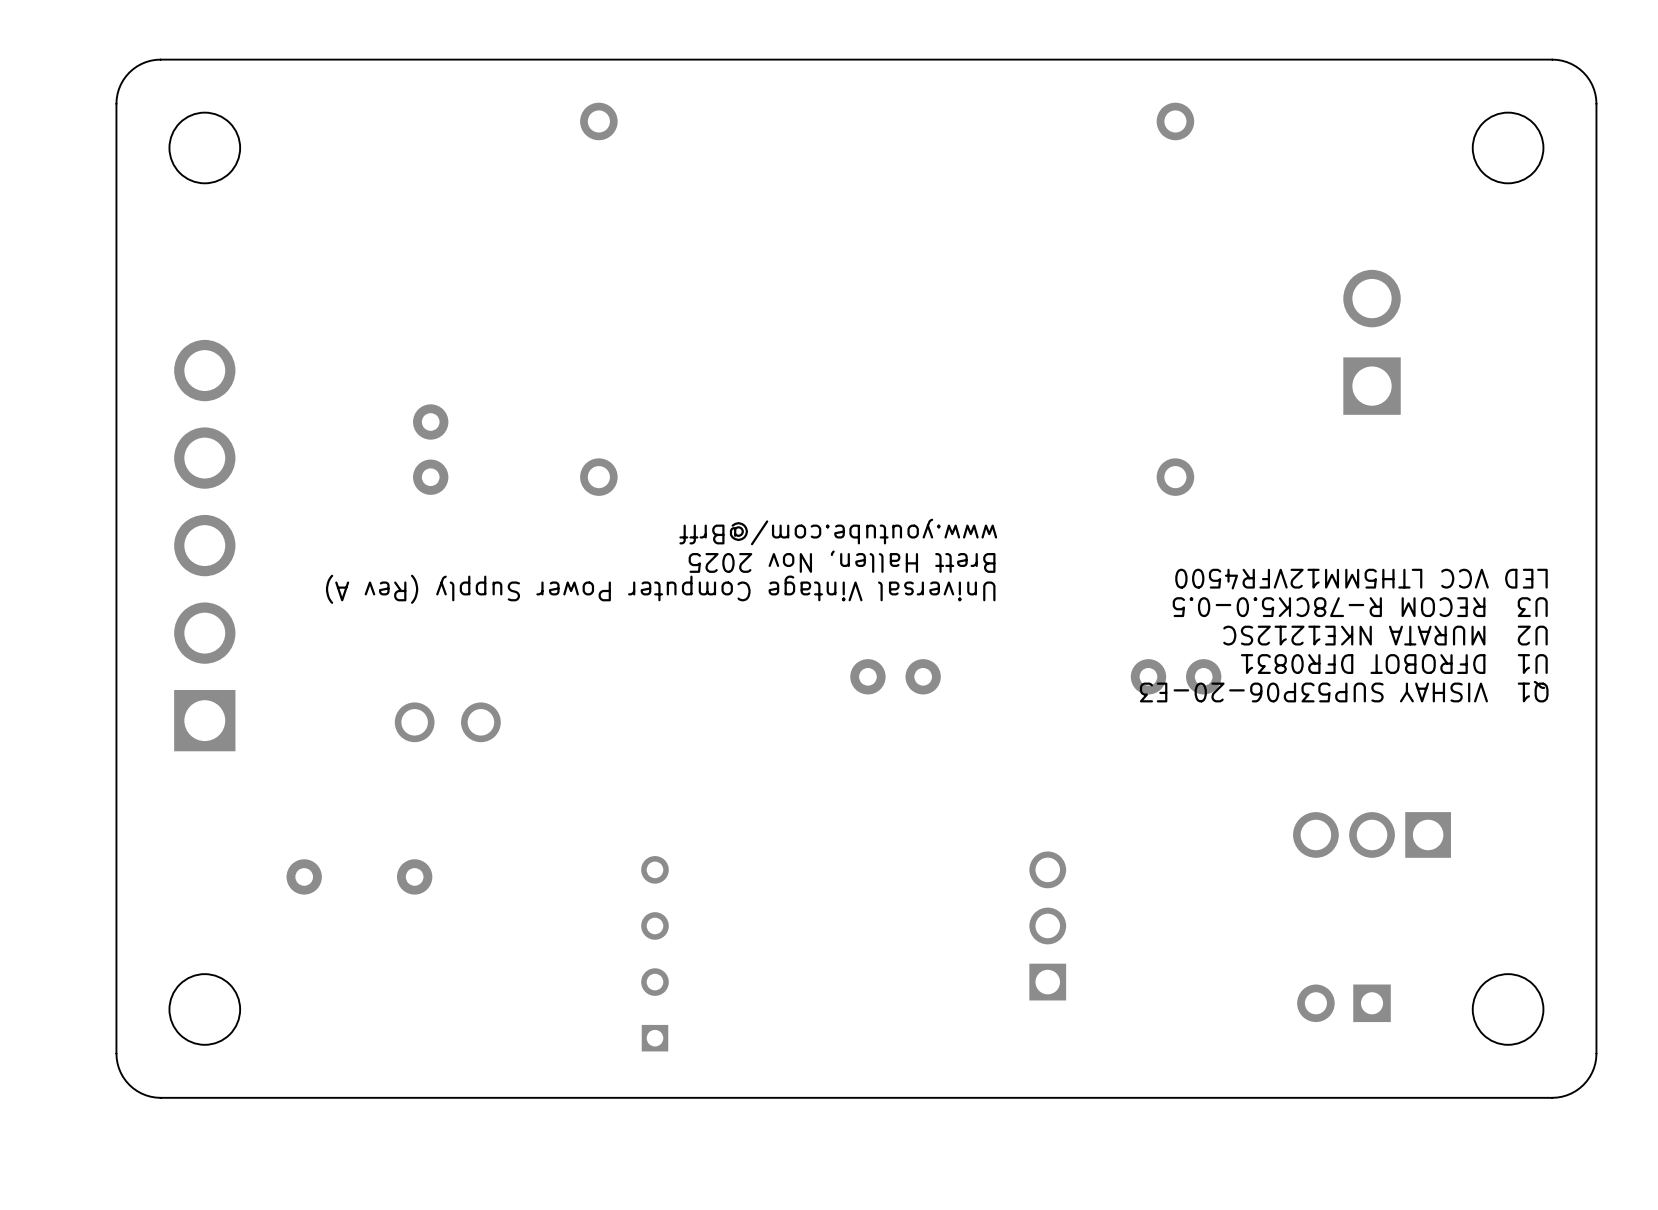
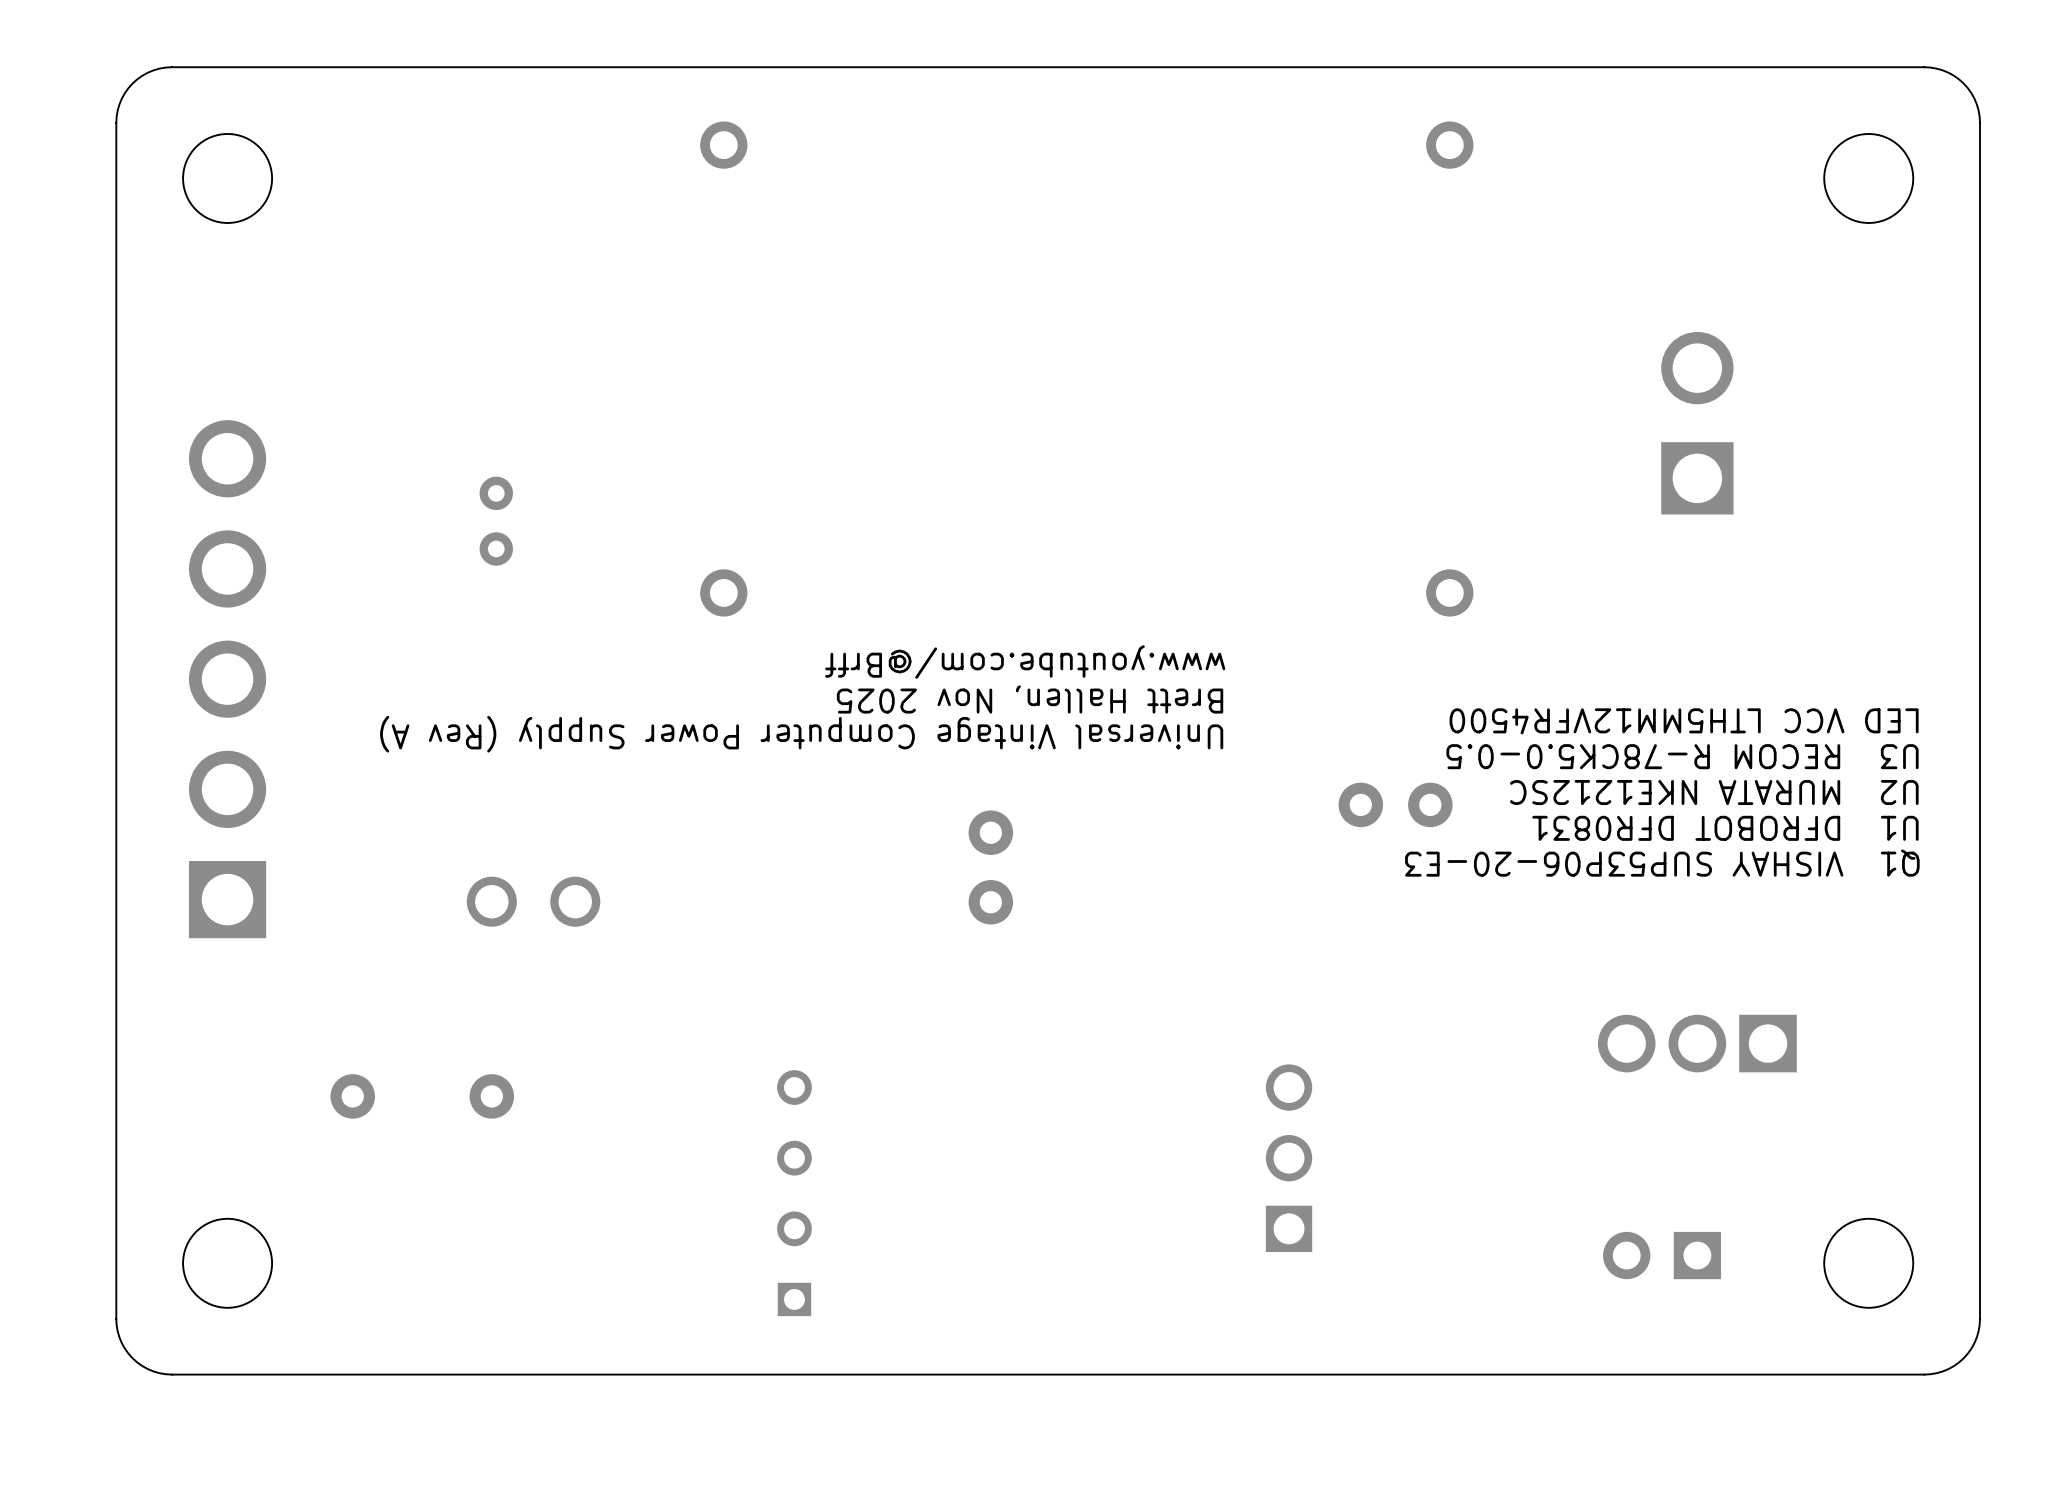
part: none -> (496, 521)
part: (430, 449) -> none
part rotation: 0° (895, 676) -> 90° clockwise (990, 867)
part position: (895, 676) -> (990, 867)
part position: (1176, 676) -> (1395, 804)

